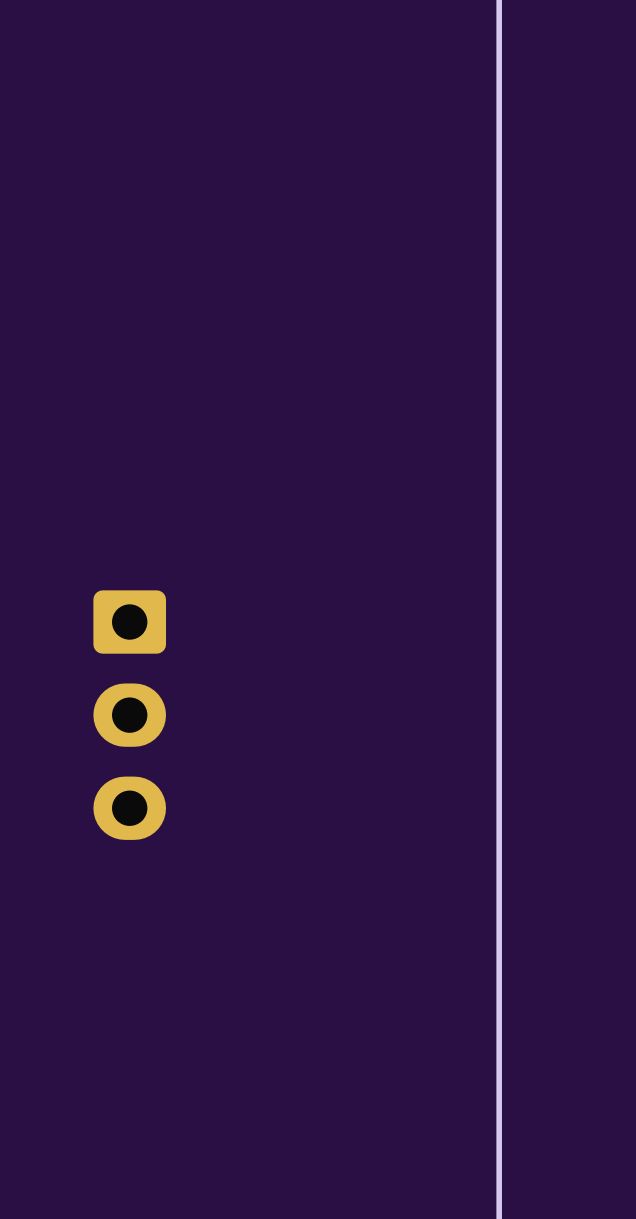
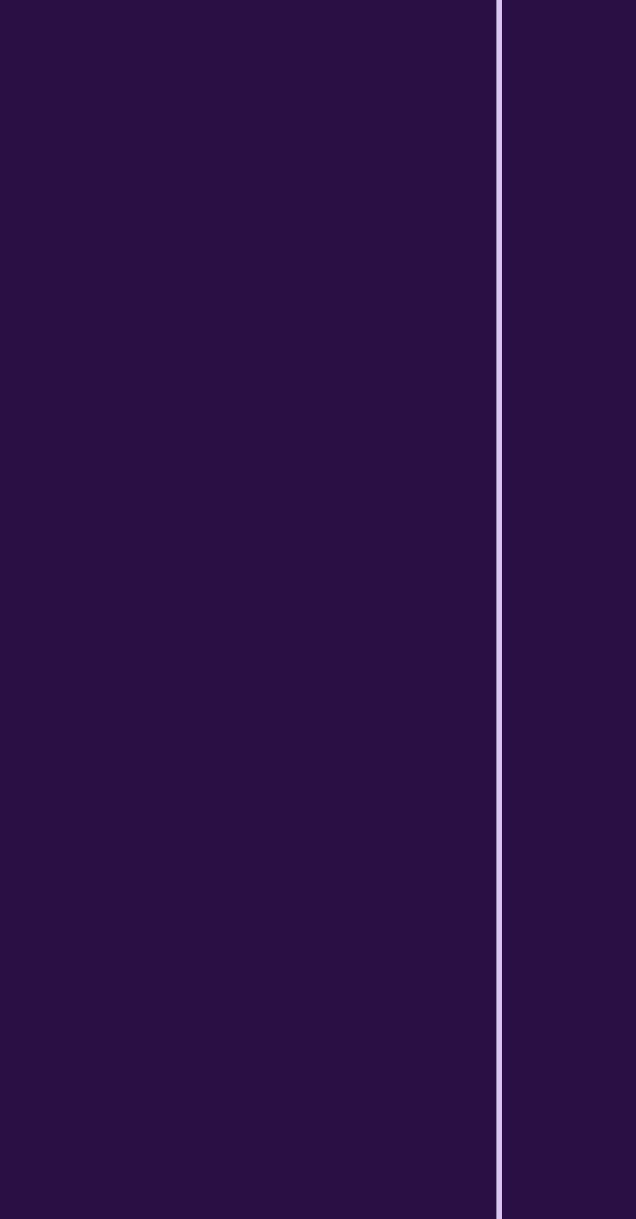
part: (129, 715) -> none

